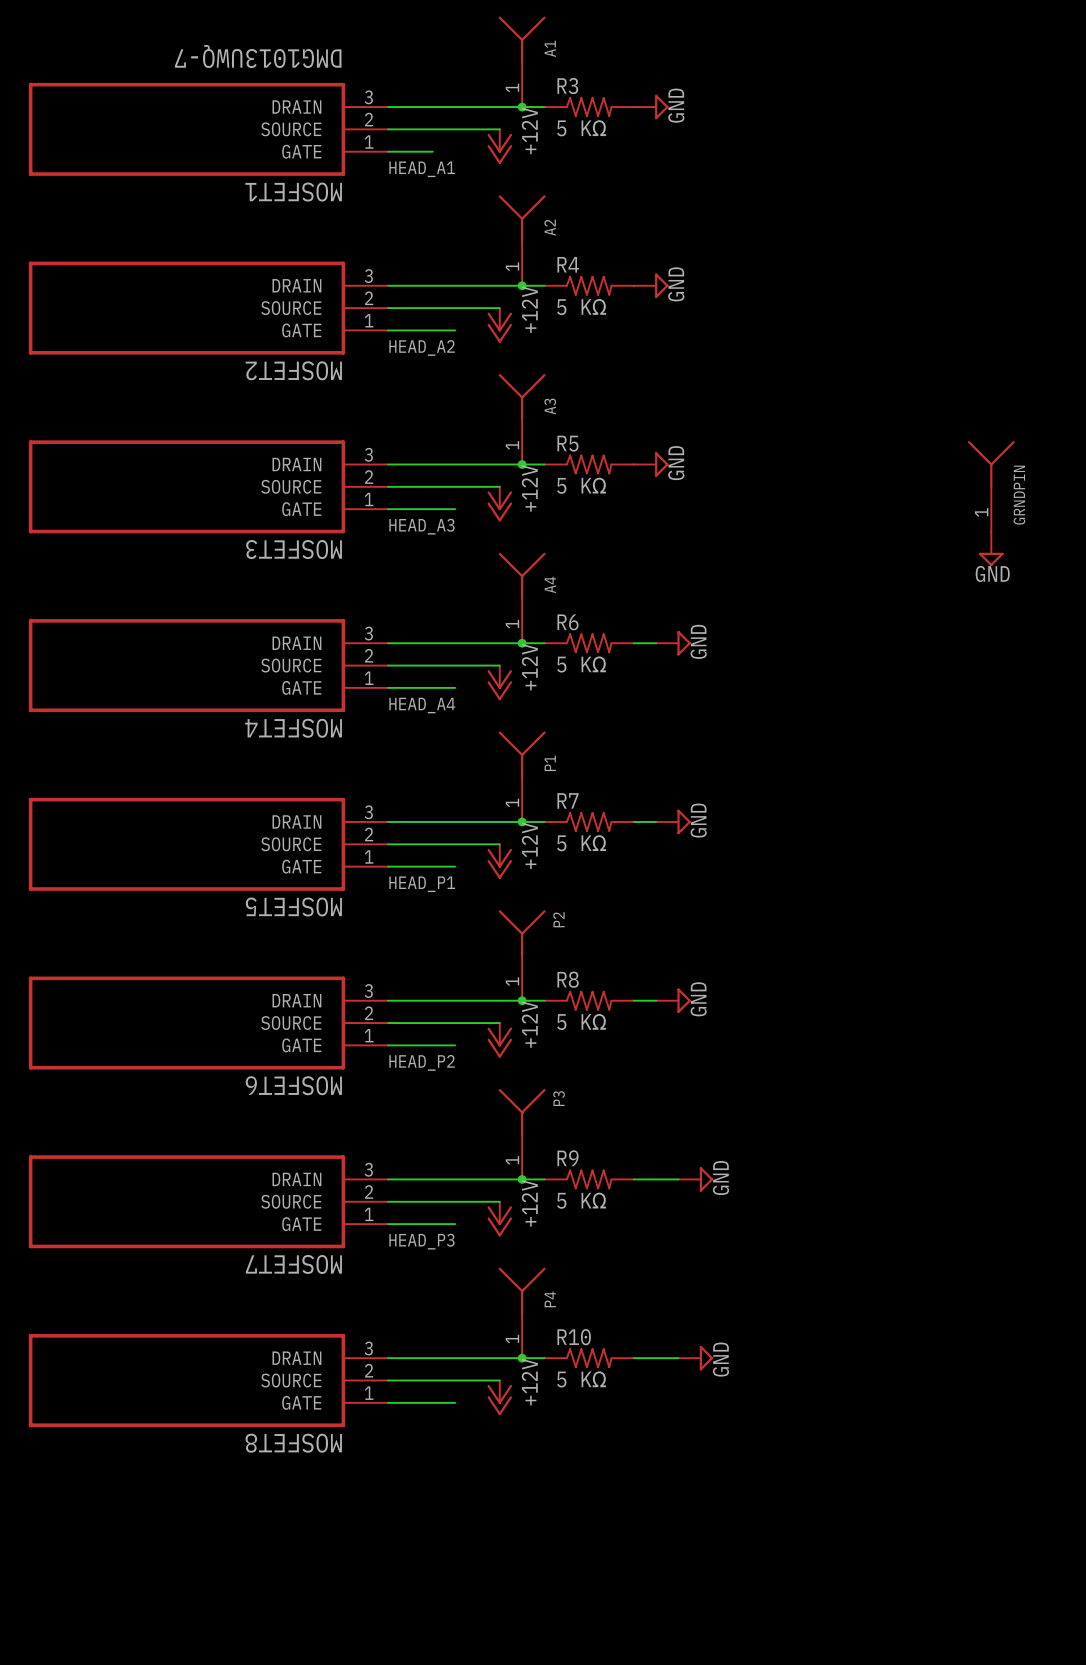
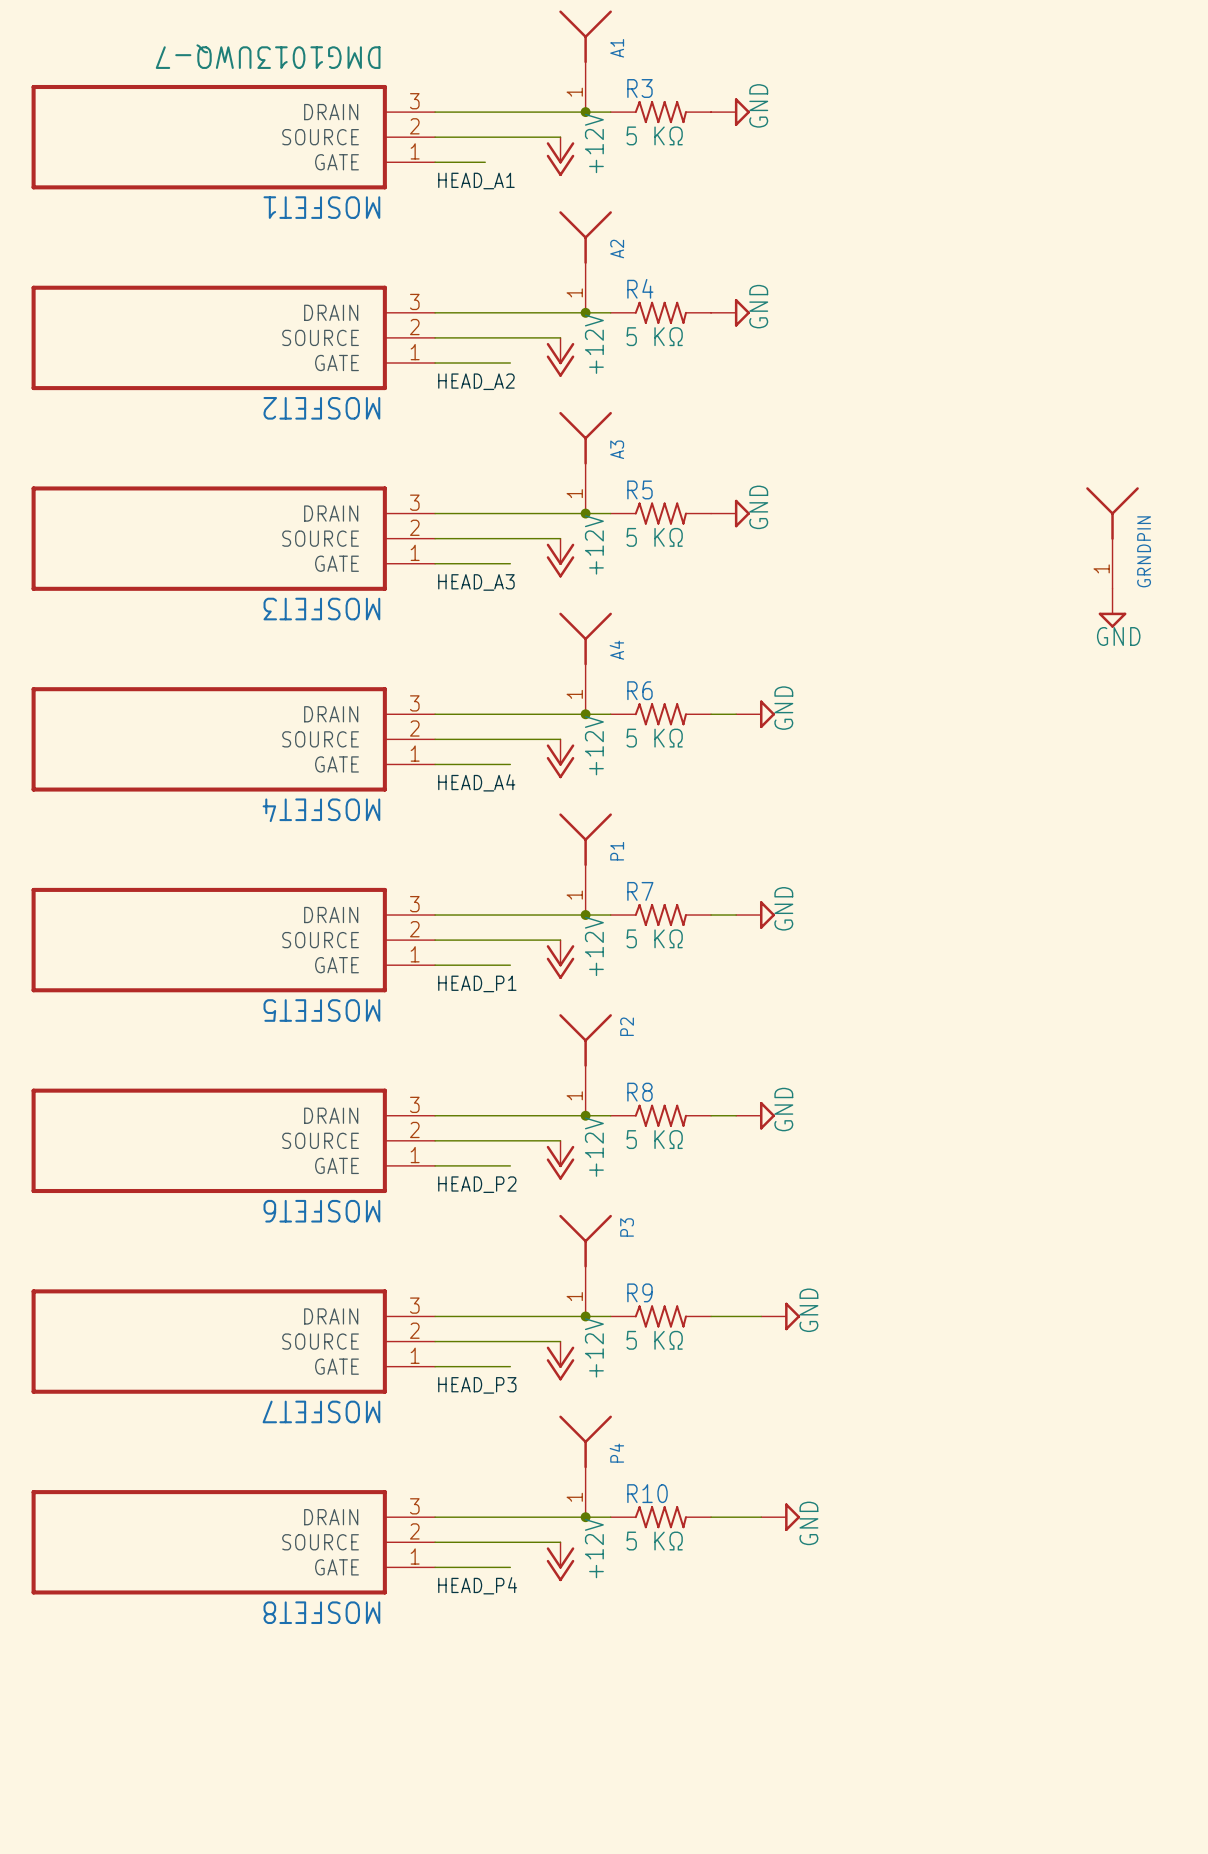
label: none -> HEAD_P4 (477, 1585)

